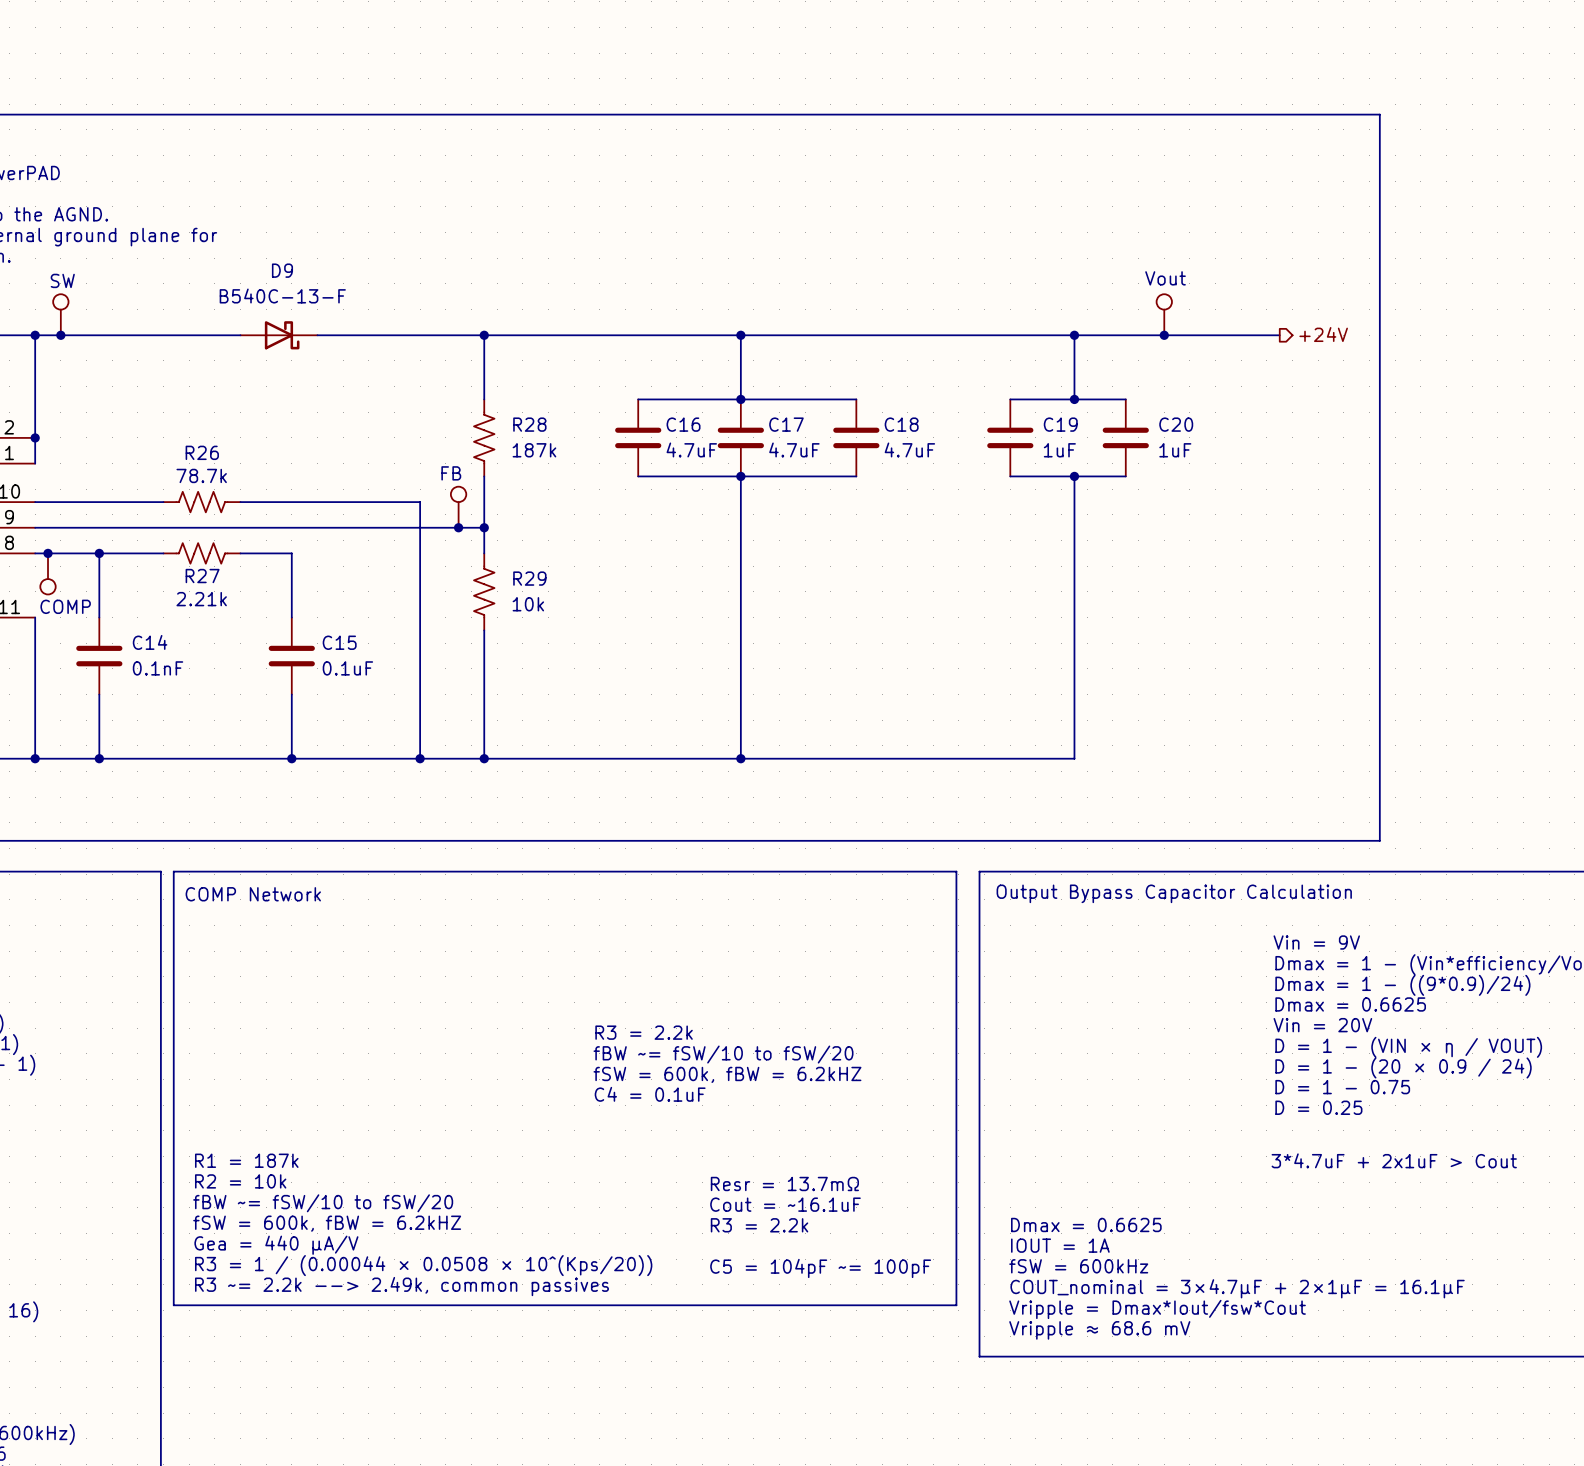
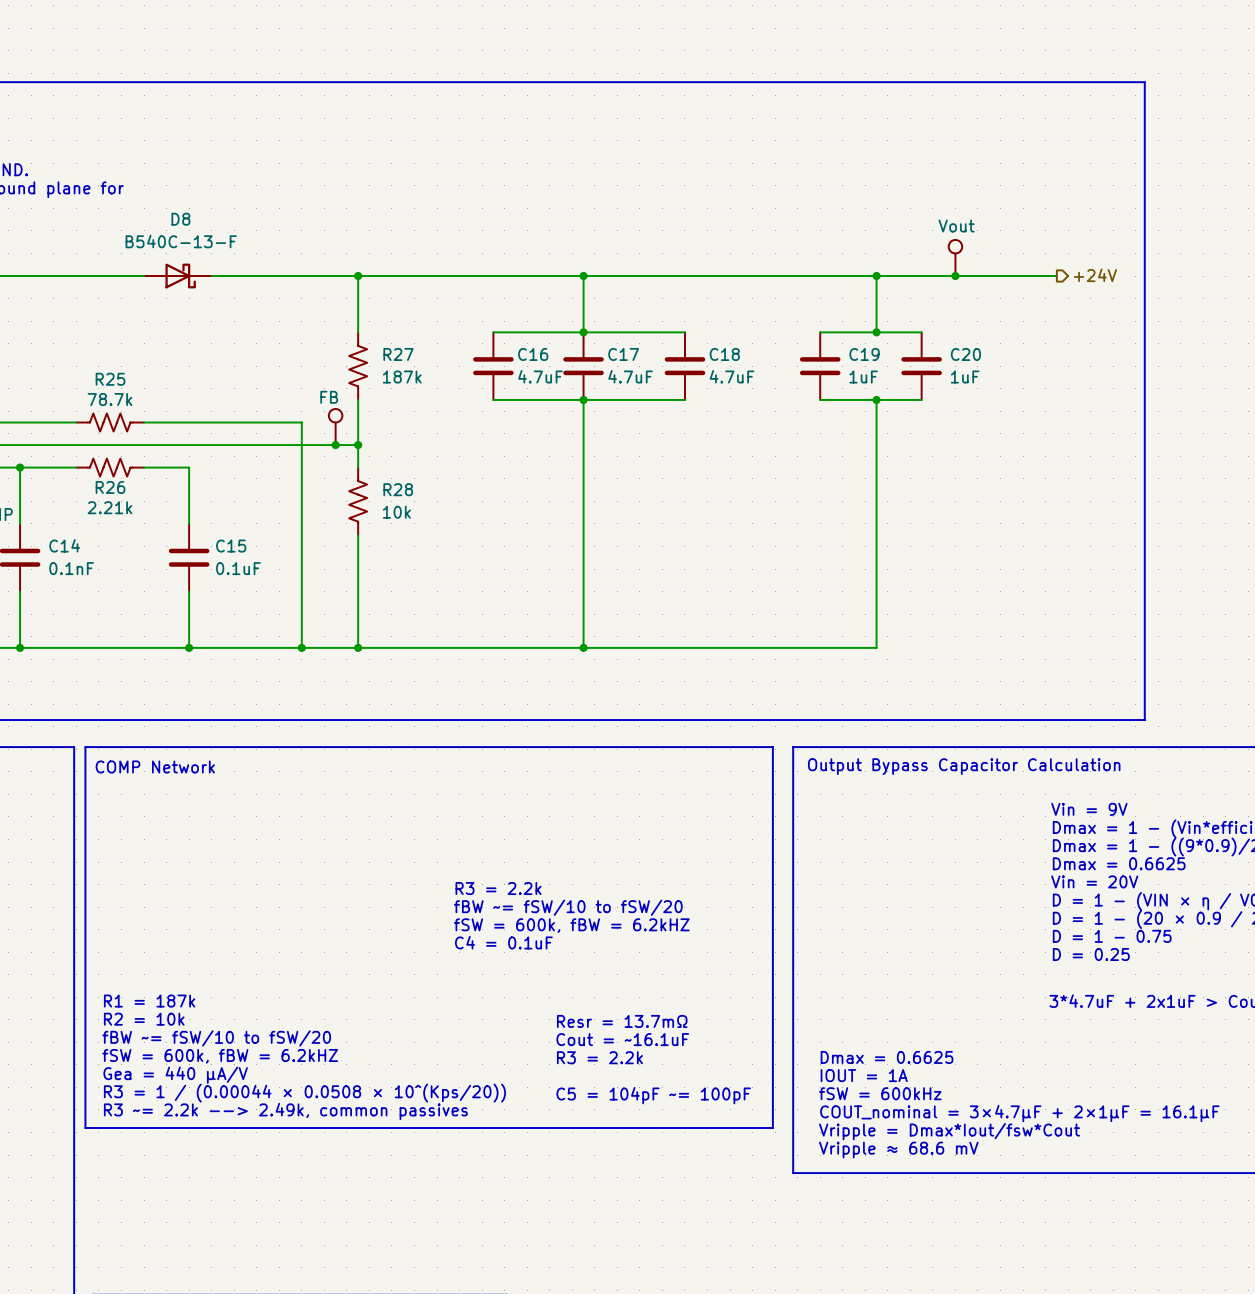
D9 name: D9 (282, 270) -> D8 (180, 219)
R28 name: R28 (529, 424) -> R27 (398, 354)
R26 name: R26 (202, 452) -> R25 (110, 379)
R27 name: R27 (202, 576) -> R26 (110, 487)
R29 name: R29 (529, 578) -> R28 (398, 489)

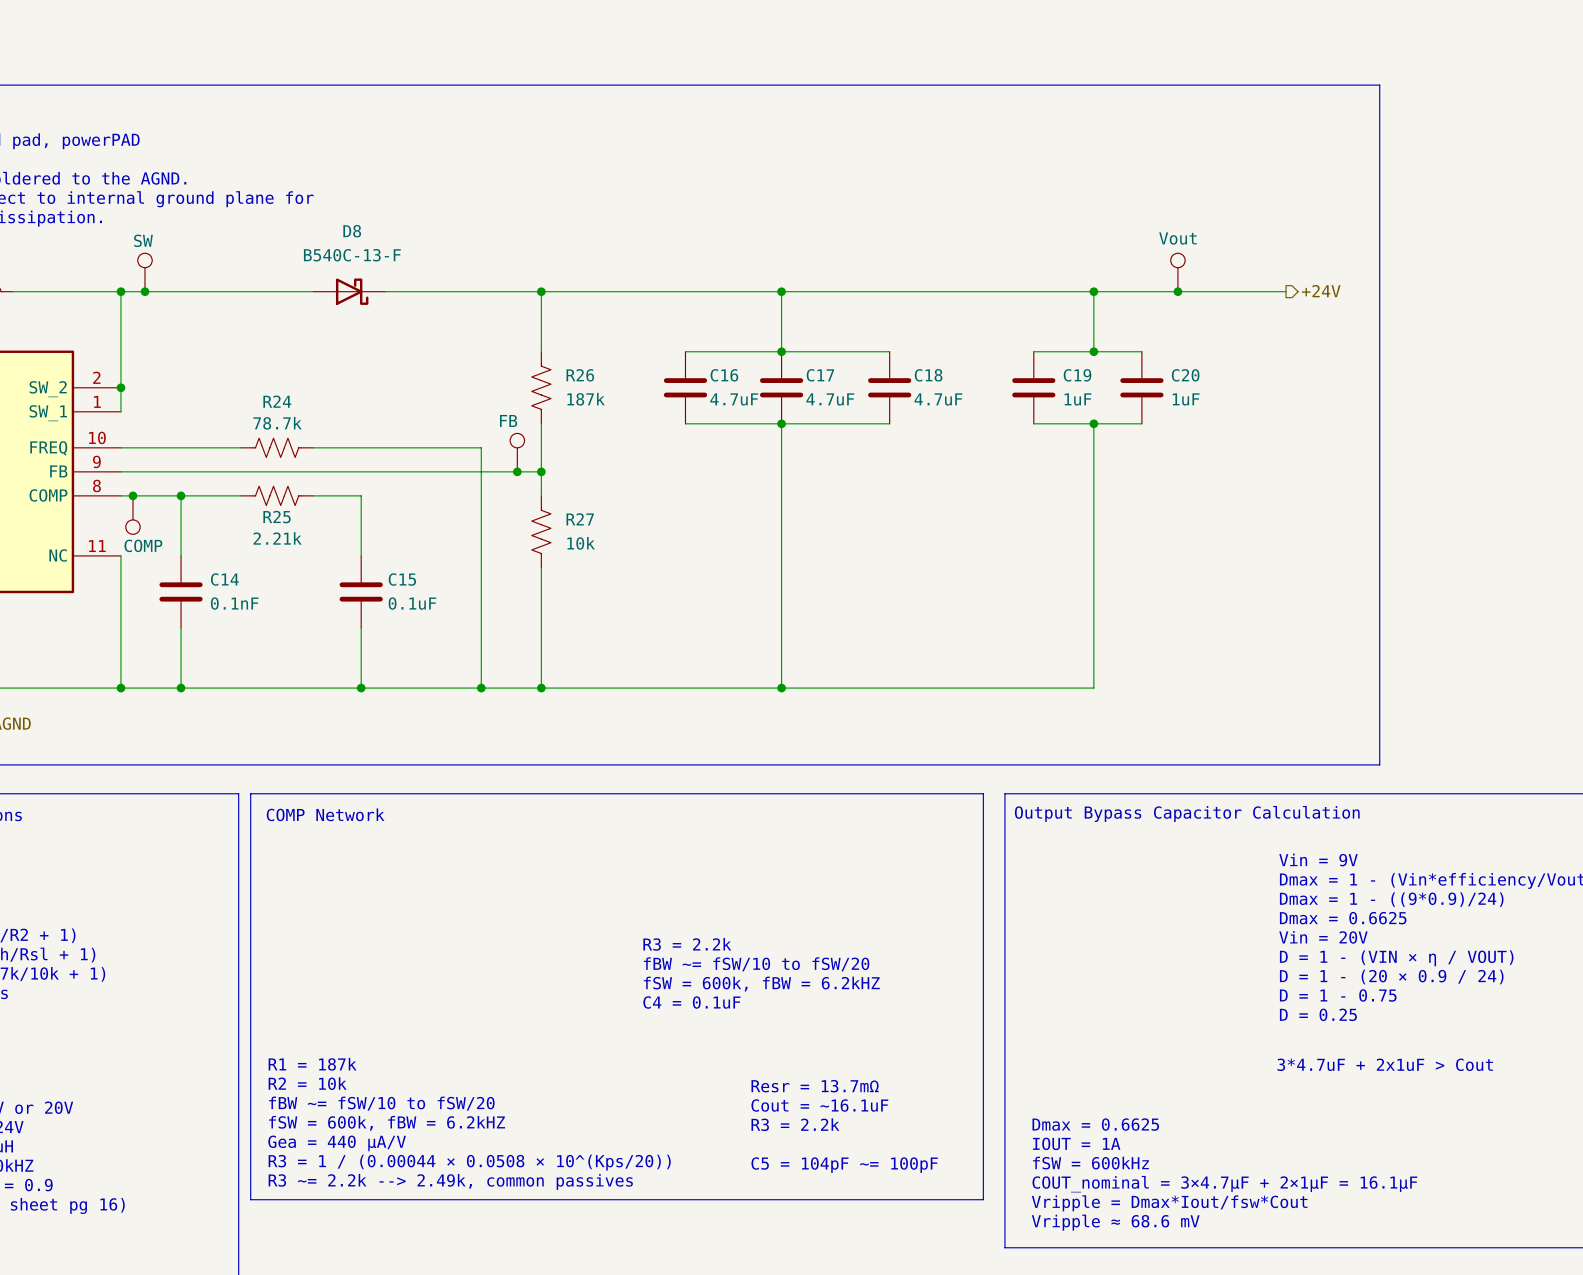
R27 name: R27 (398, 354) -> R26 (580, 375)
R25 name: R25 (110, 379) -> R24 (277, 401)
R26 name: R26 (110, 487) -> R25 (277, 517)
R28 name: R28 (398, 489) -> R27 (580, 519)

